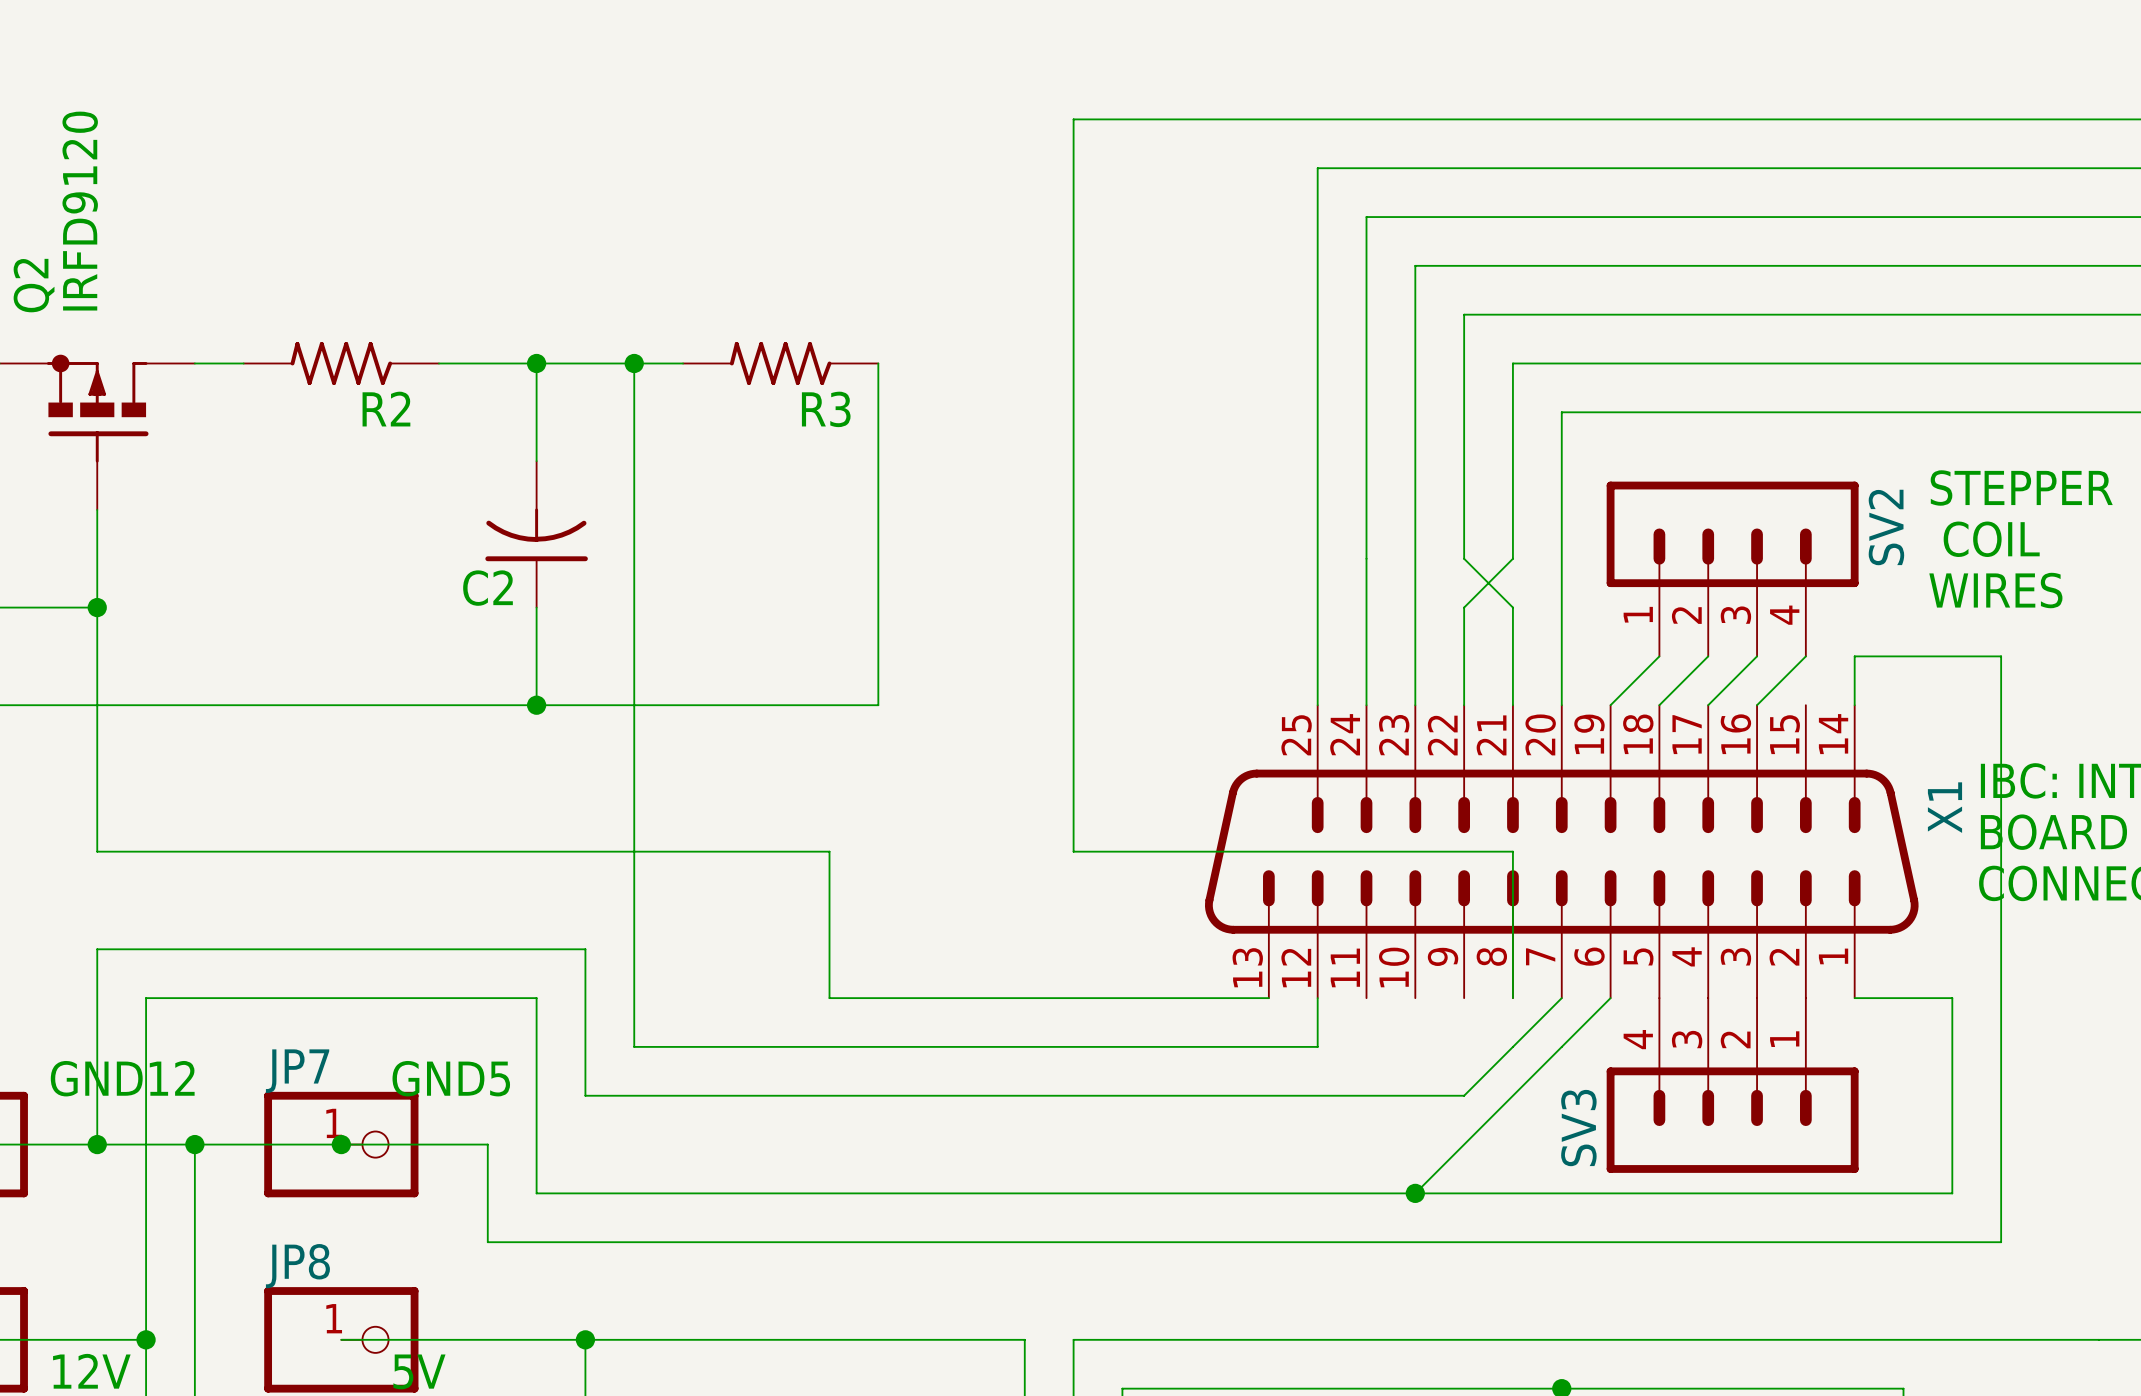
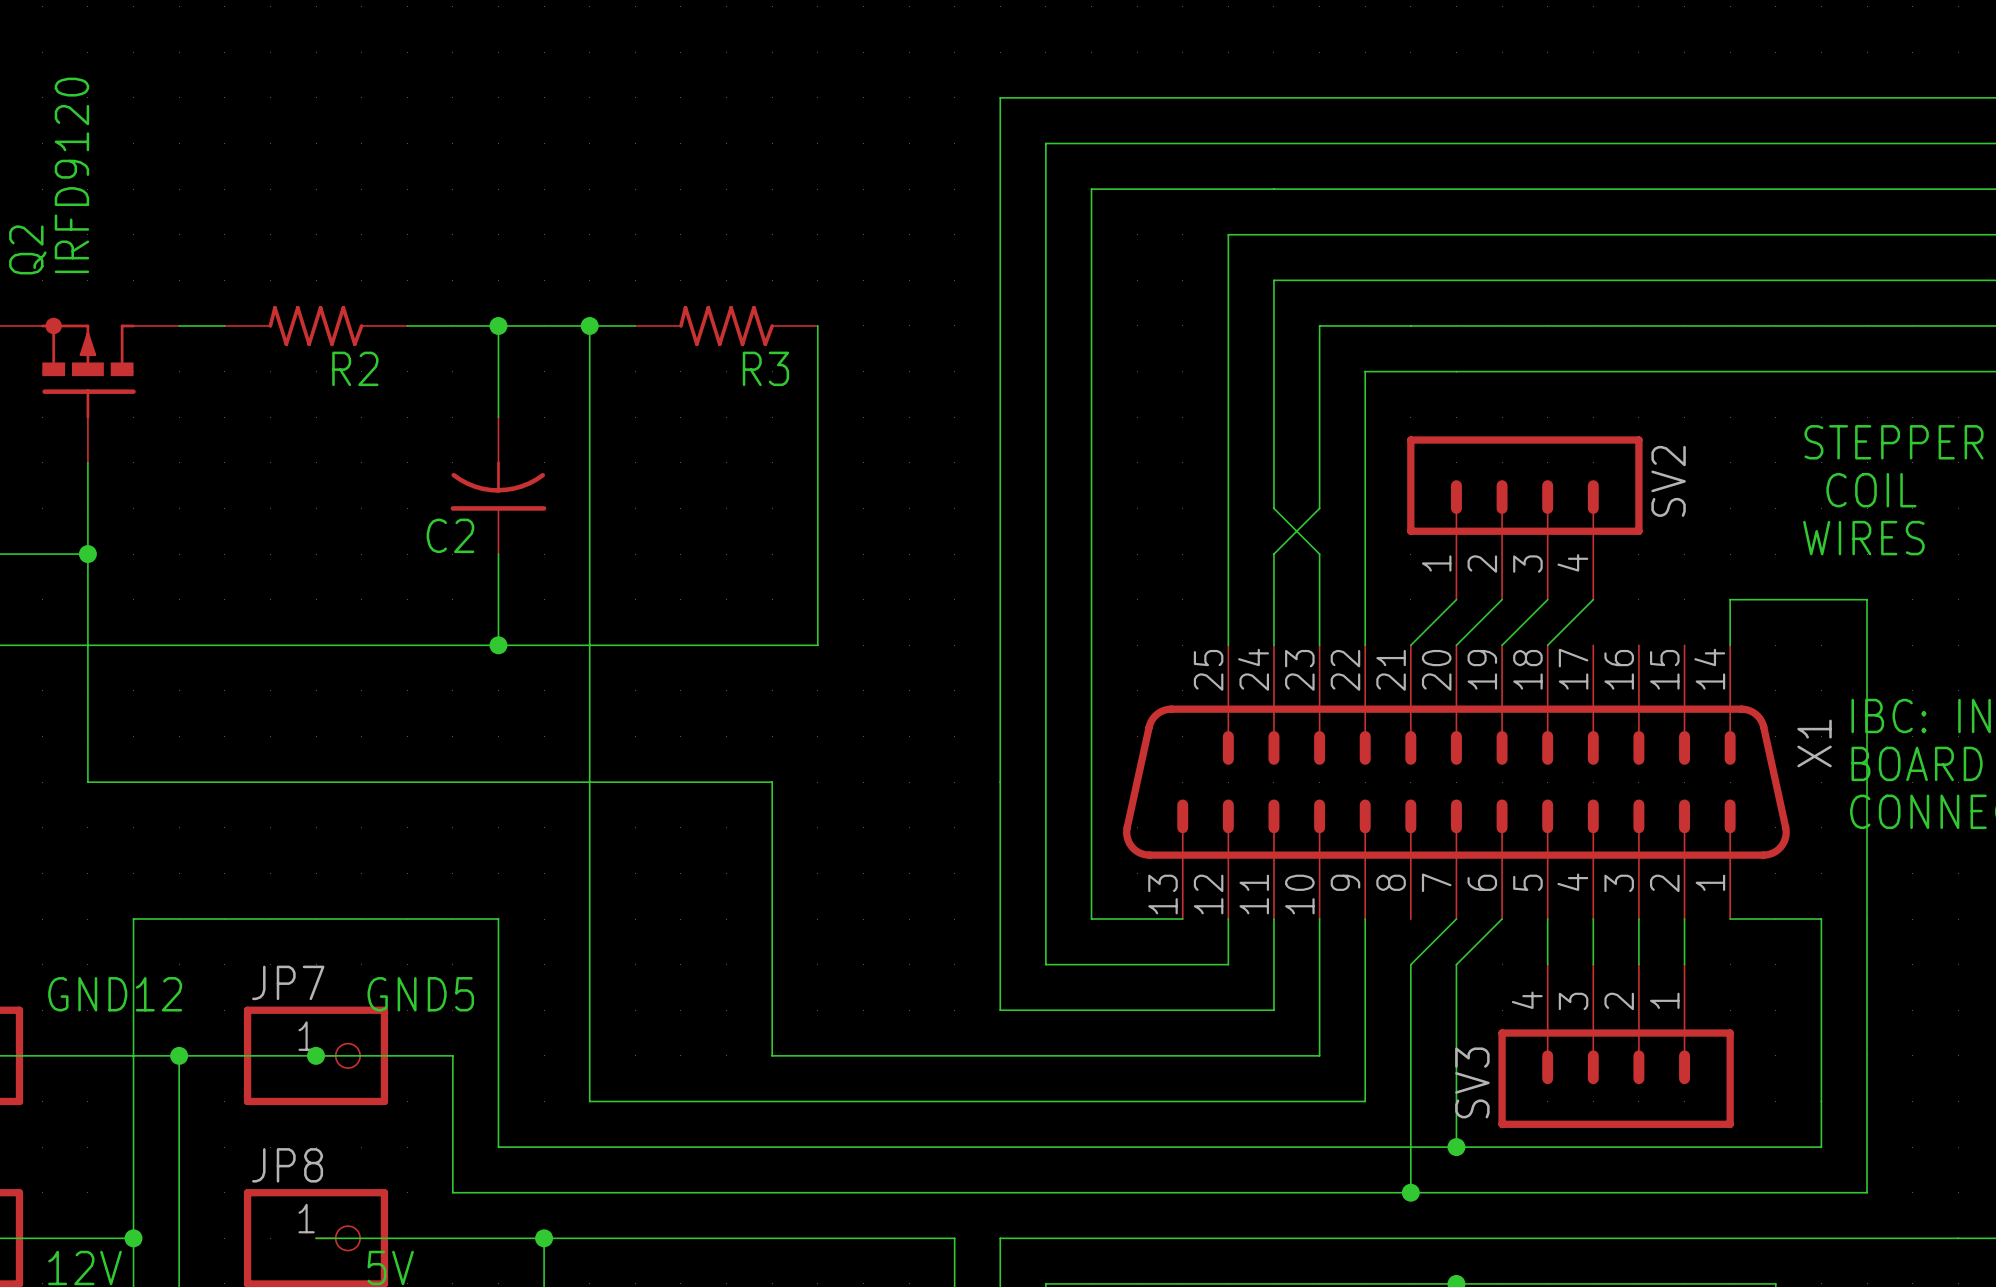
wire: (1317, 168) (1317, 265) -> (1319, 234) (1228, 234)
wire: (1366, 217) (1366, 314) -> (1365, 280) (1273, 280)
wire: none -> (1273, 189) (1091, 189) (1091, 919)
wire: (1415, 265) (1415, 363) -> (1410, 325) (1319, 325)
wire: (1464, 314) (1464, 412) -> (1456, 371) (1365, 371)
wire: (1512, 363) (1512, 558) (1464, 607) -> none
wire: (1561, 412) (1561, 705) -> (1502, 599) (1456, 645)
wire: (1366, 558) (1366, 607) -> (1273, 508) (1319, 554)
wire: (1415, 558) (1415, 607) -> (1319, 508) (1273, 554)
wire: (1464, 558) (1512, 607) (1512, 705) -> (1365, 508) (1365, 554)
SV2 position: (1732, 569) -> (1524, 518)
wire: (1757, 656) (1708, 705) -> (1456, 599) (1410, 645)
wire: (1805, 656) (1757, 705) -> none
wire: (1073, 851) (1512, 851) (1512, 998) -> (1000, 782) (1000, 1010)
wire: (829, 998) (1171, 998) -> (772, 919) (772, 1055) (1319, 1055) (1319, 919)
wire: (634, 1046) (1122, 1046) -> (1228, 143) (1045, 143) (1045, 964)
wire: (1512, 1046) (1464, 1095) (1366, 1095) -> (1273, 919) (1273, 1010)
wire: none -> (1410, 964) (1410, 1192)
wire: (1561, 1046) (1415, 1193) -> (1456, 964) (1456, 1147)
SV3 position: (1732, 1085) -> (1616, 1046)
wire: (1073, 1095) (585, 1095) (585, 949) (97, 949) (97, 1144) -> none
junction: (97, 1144) -> none
wire: (536, 1193) (634, 1193) -> (589, 964) (589, 1101)
junction: (1415, 1193) -> none
wire: (1464, 1193) (1952, 1193) -> (1365, 1101) (1365, 919)
wire: (487, 1242) (536, 1242) -> (498, 1101) (498, 1147)
wire: none -> (452, 1147) (452, 1192) (1867, 1192) (1867, 1147)
junction: none -> (1456, 1147)
wire: (1952, 1242) (2001, 1242) -> (1821, 1147) (1821, 1101)
junction: none -> (1410, 1192)

